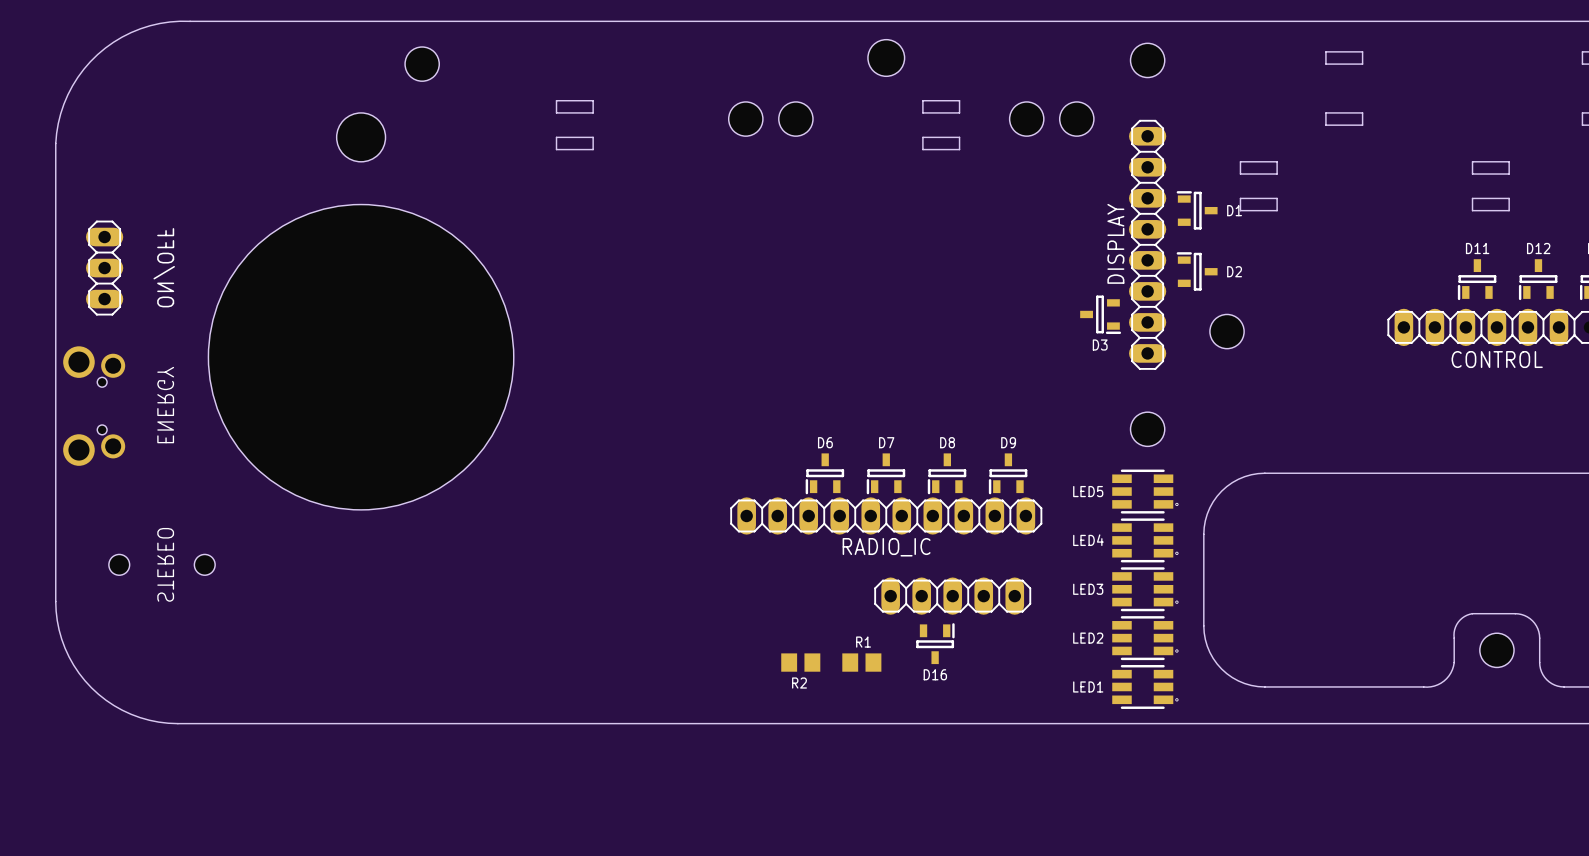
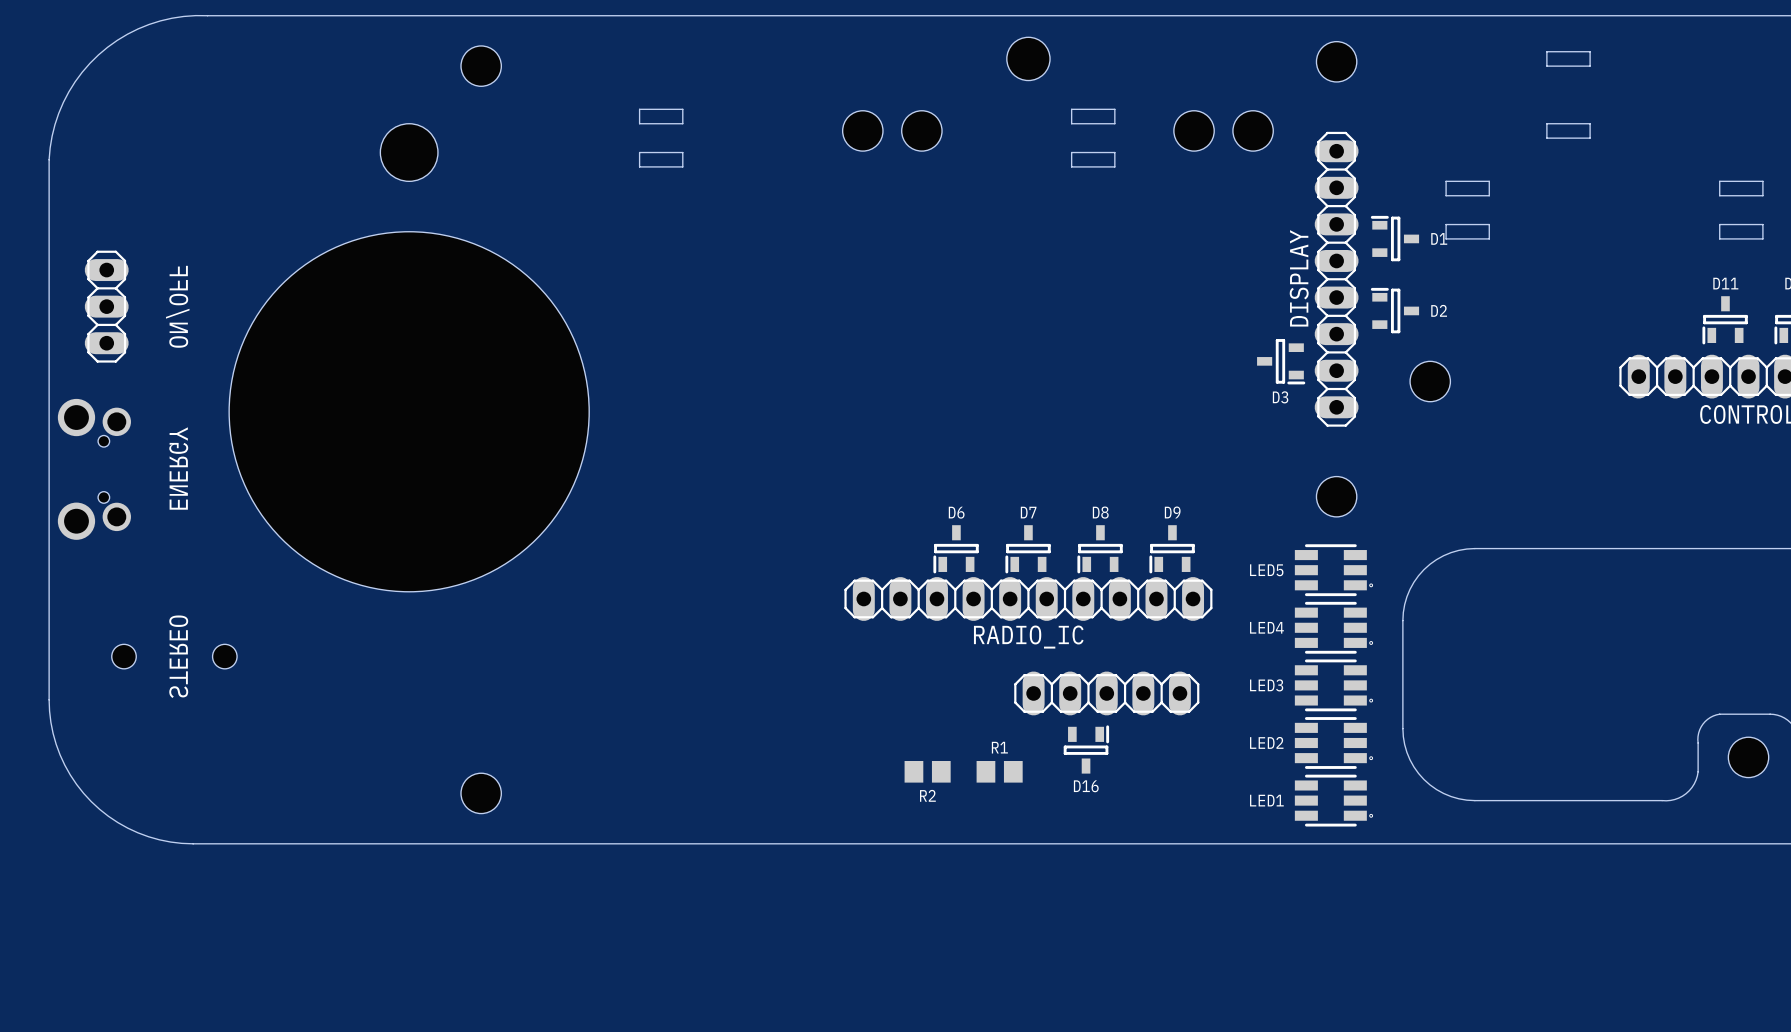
hole: none -> (481, 793)

